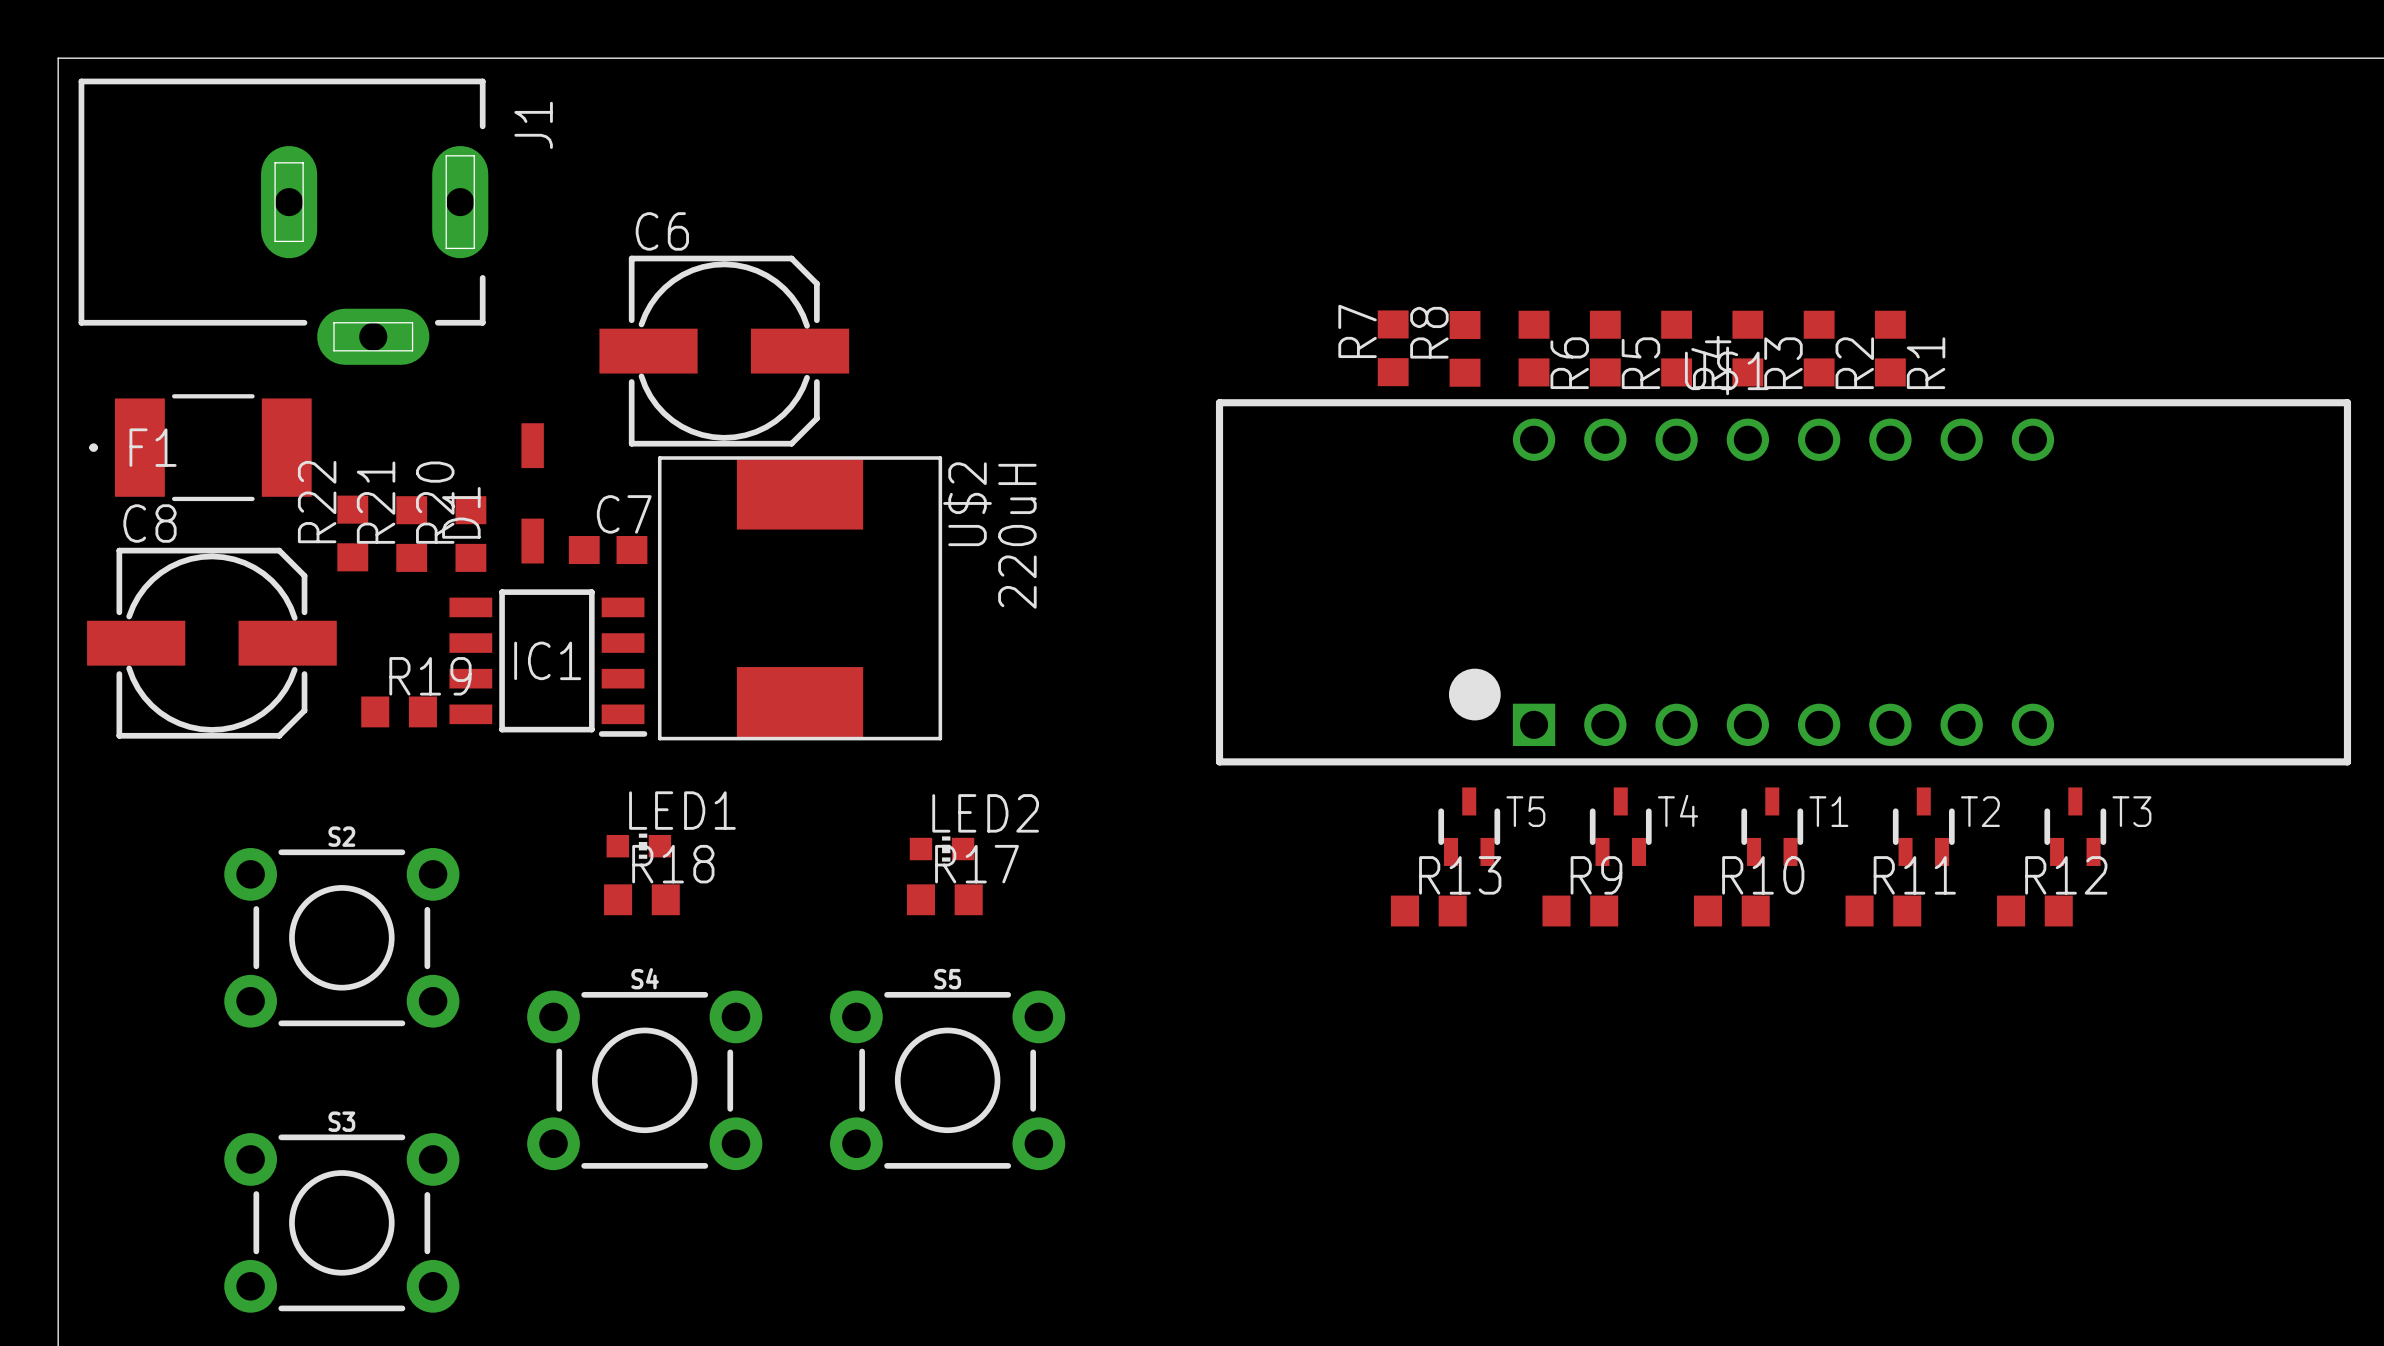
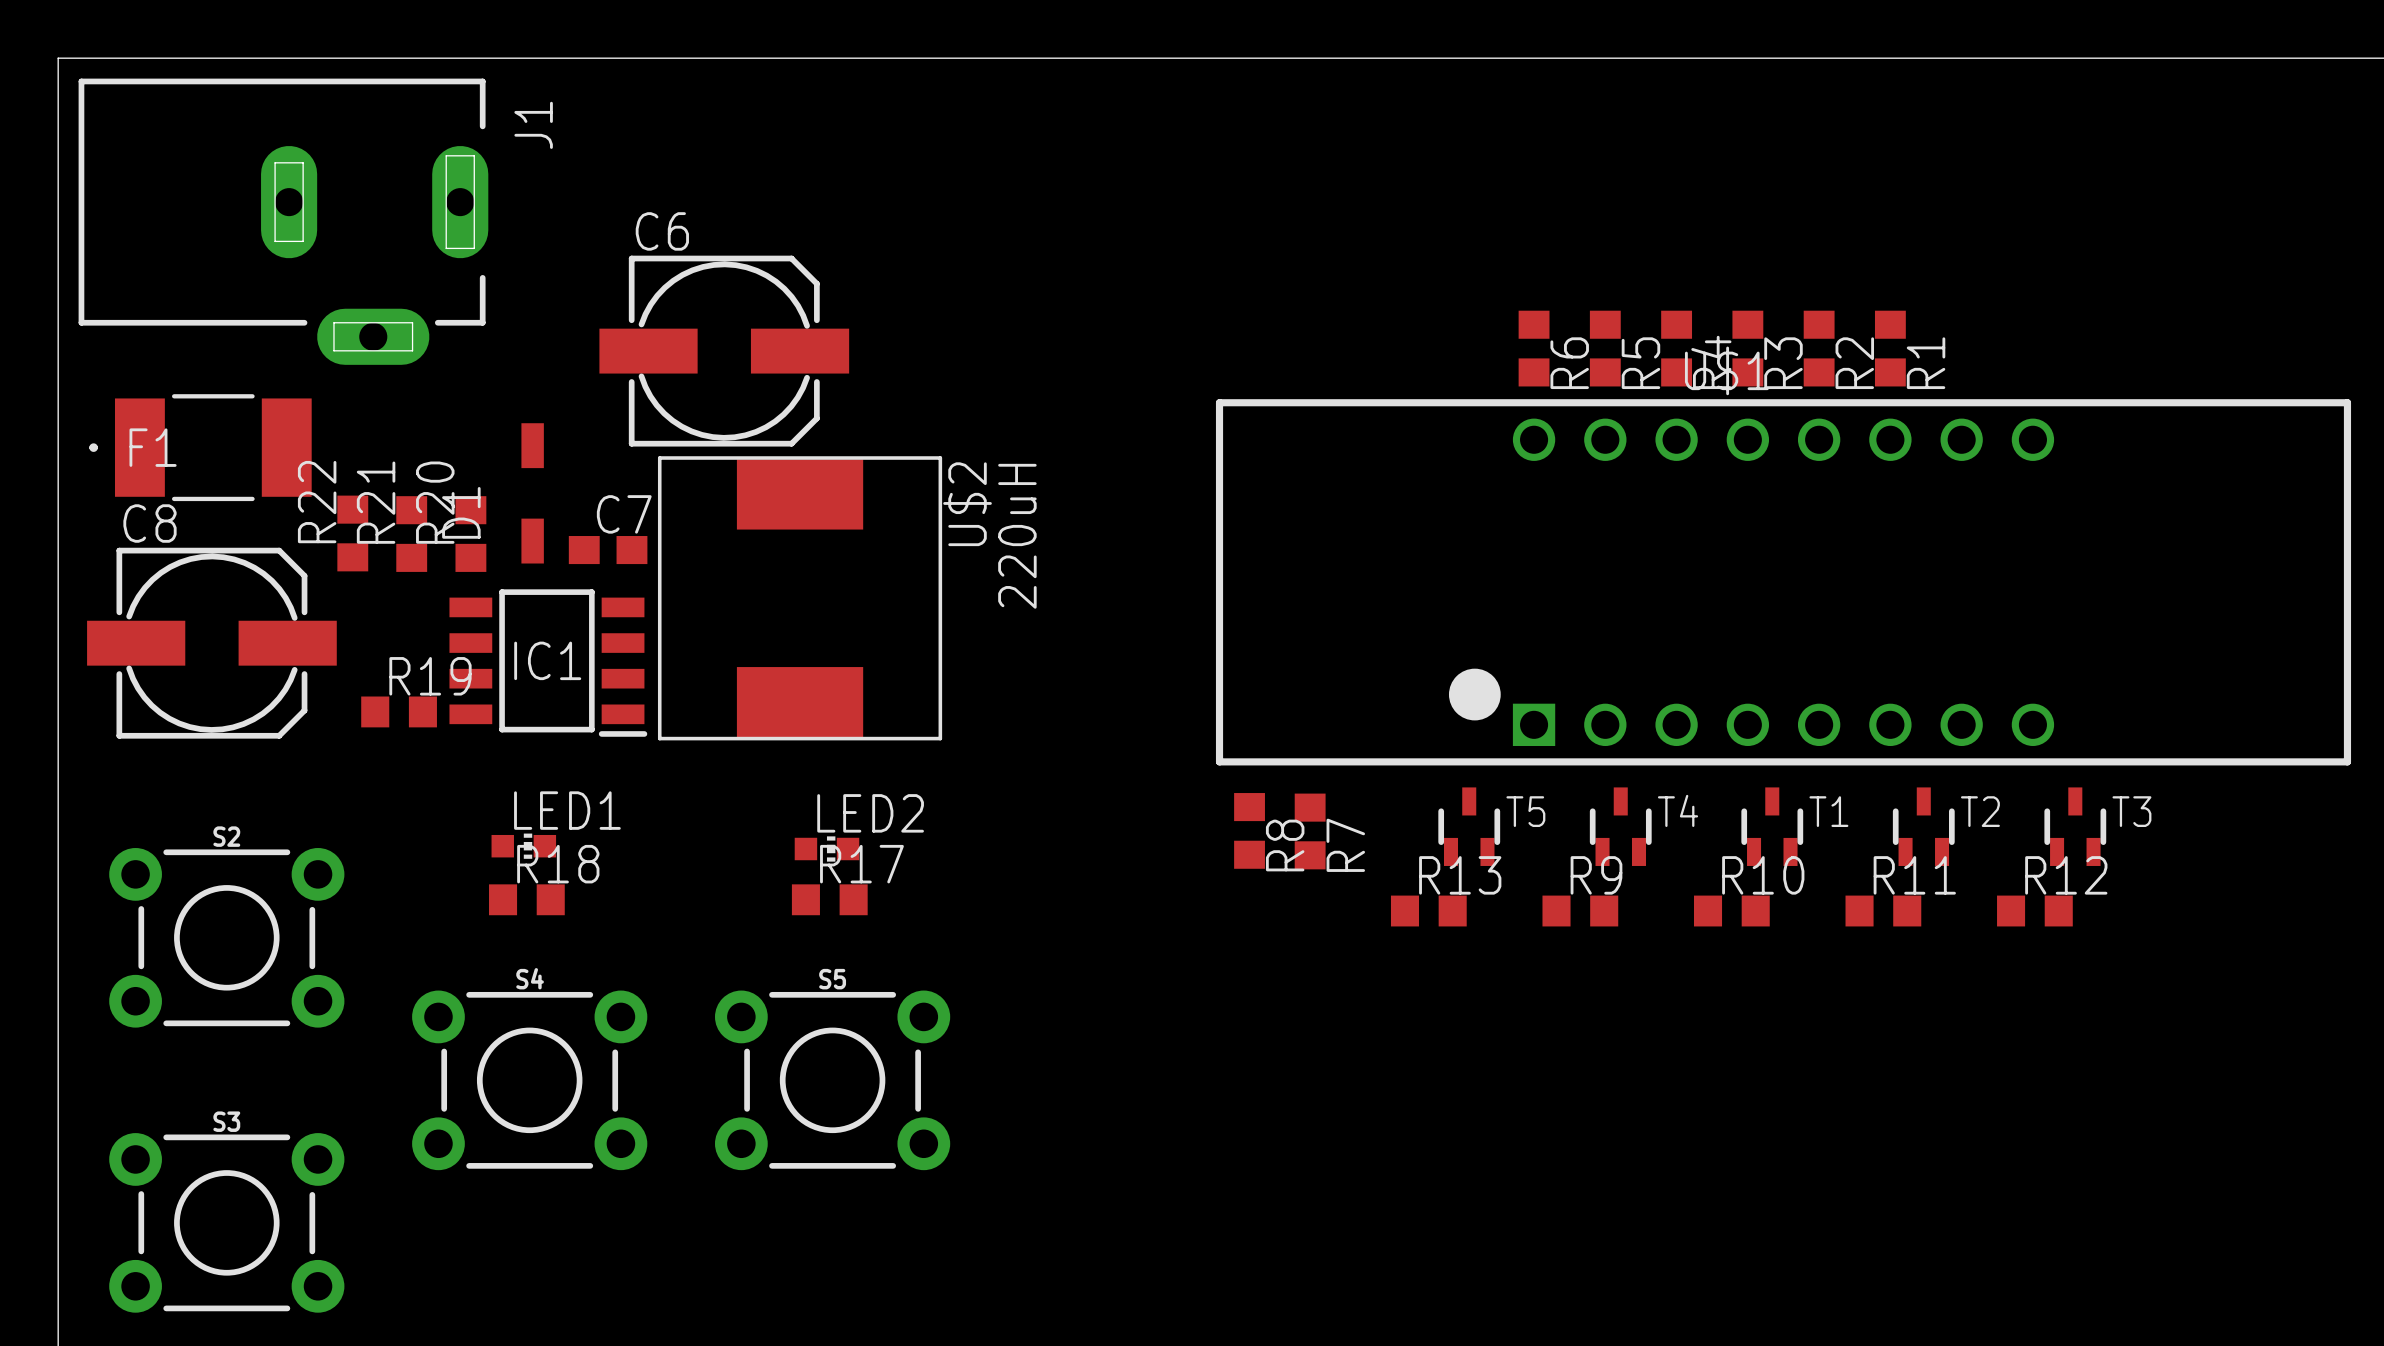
R7 name position: R7 (1357, 331) -> R7 (1345, 845)
R8 name position: R8 (1429, 332) -> R8 (1285, 845)
R7 position: (1393, 348) -> (1310, 831)
R8 position: (1465, 348) -> (1249, 830)
LED1 position: (638, 846) -> (523, 846)
LED2 position: (942, 849) -> (826, 849)
R18 position: (641, 899) -> (526, 899)
R17 position: (944, 899) -> (829, 899)
S2 position: (341, 937) -> (226, 937)
S4 position: (644, 1080) -> (529, 1080)
S5 position: (947, 1080) -> (832, 1080)
S3 position: (341, 1222) -> (226, 1222)

